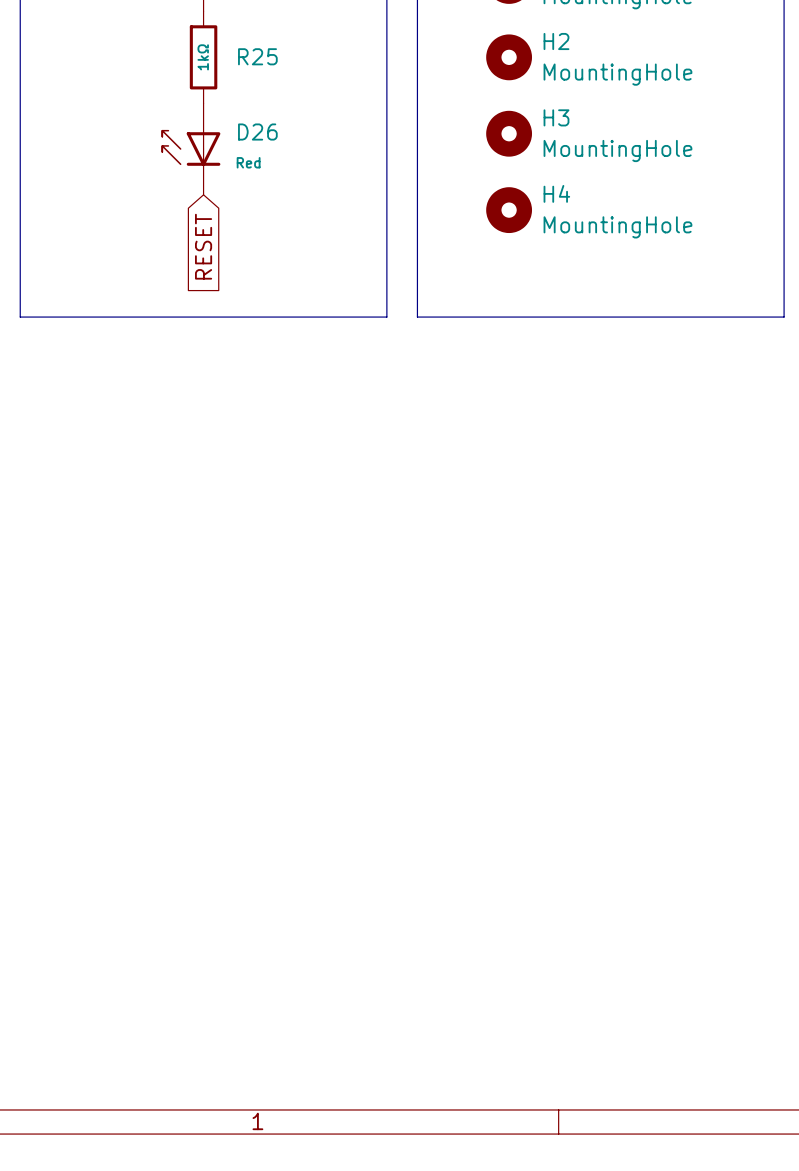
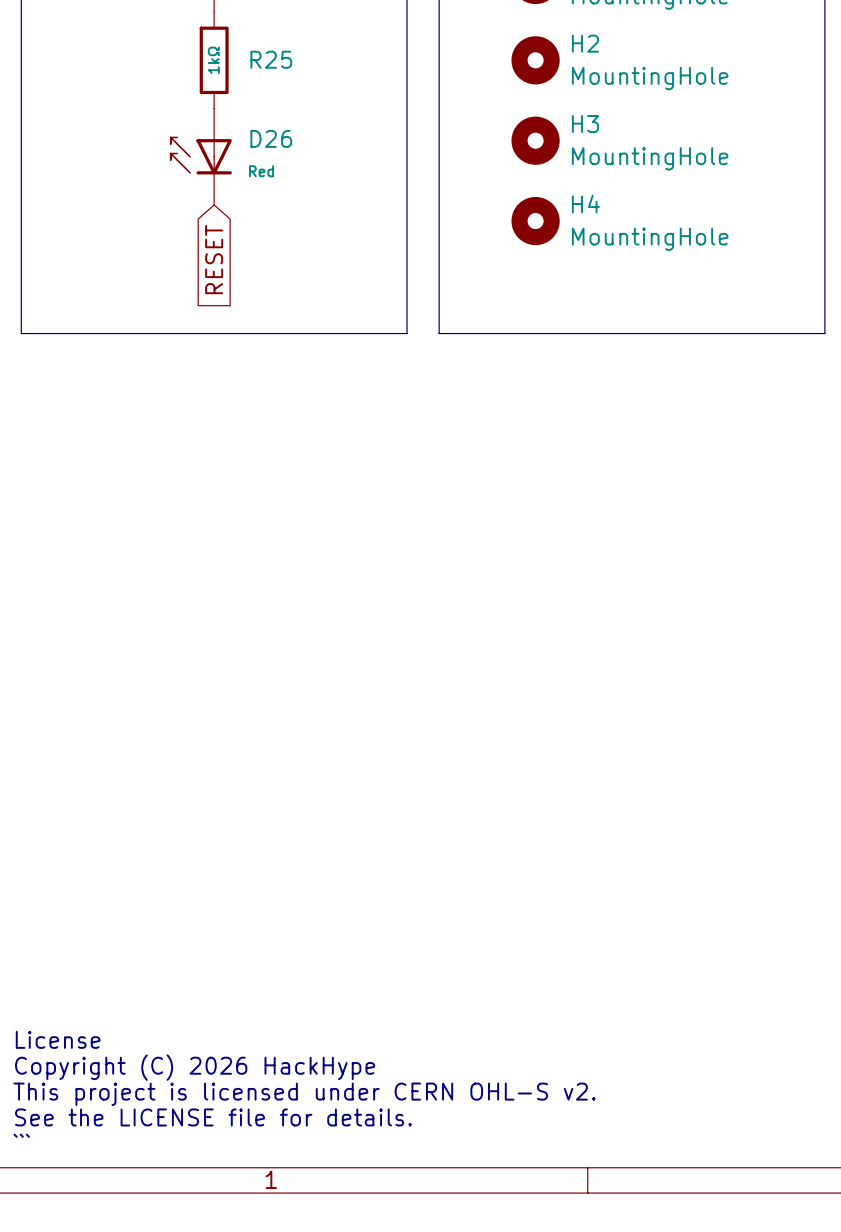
text: none -> License (58, 1039)
text: none -> Copyright (C) 2026 HackHype (195, 1067)
text: none -> This project is licensed under CERN OHL-S v2. (304, 1094)
text: none -> See the LICENSE file for details. (213, 1117)
text: none -> ``` (21, 1135)

